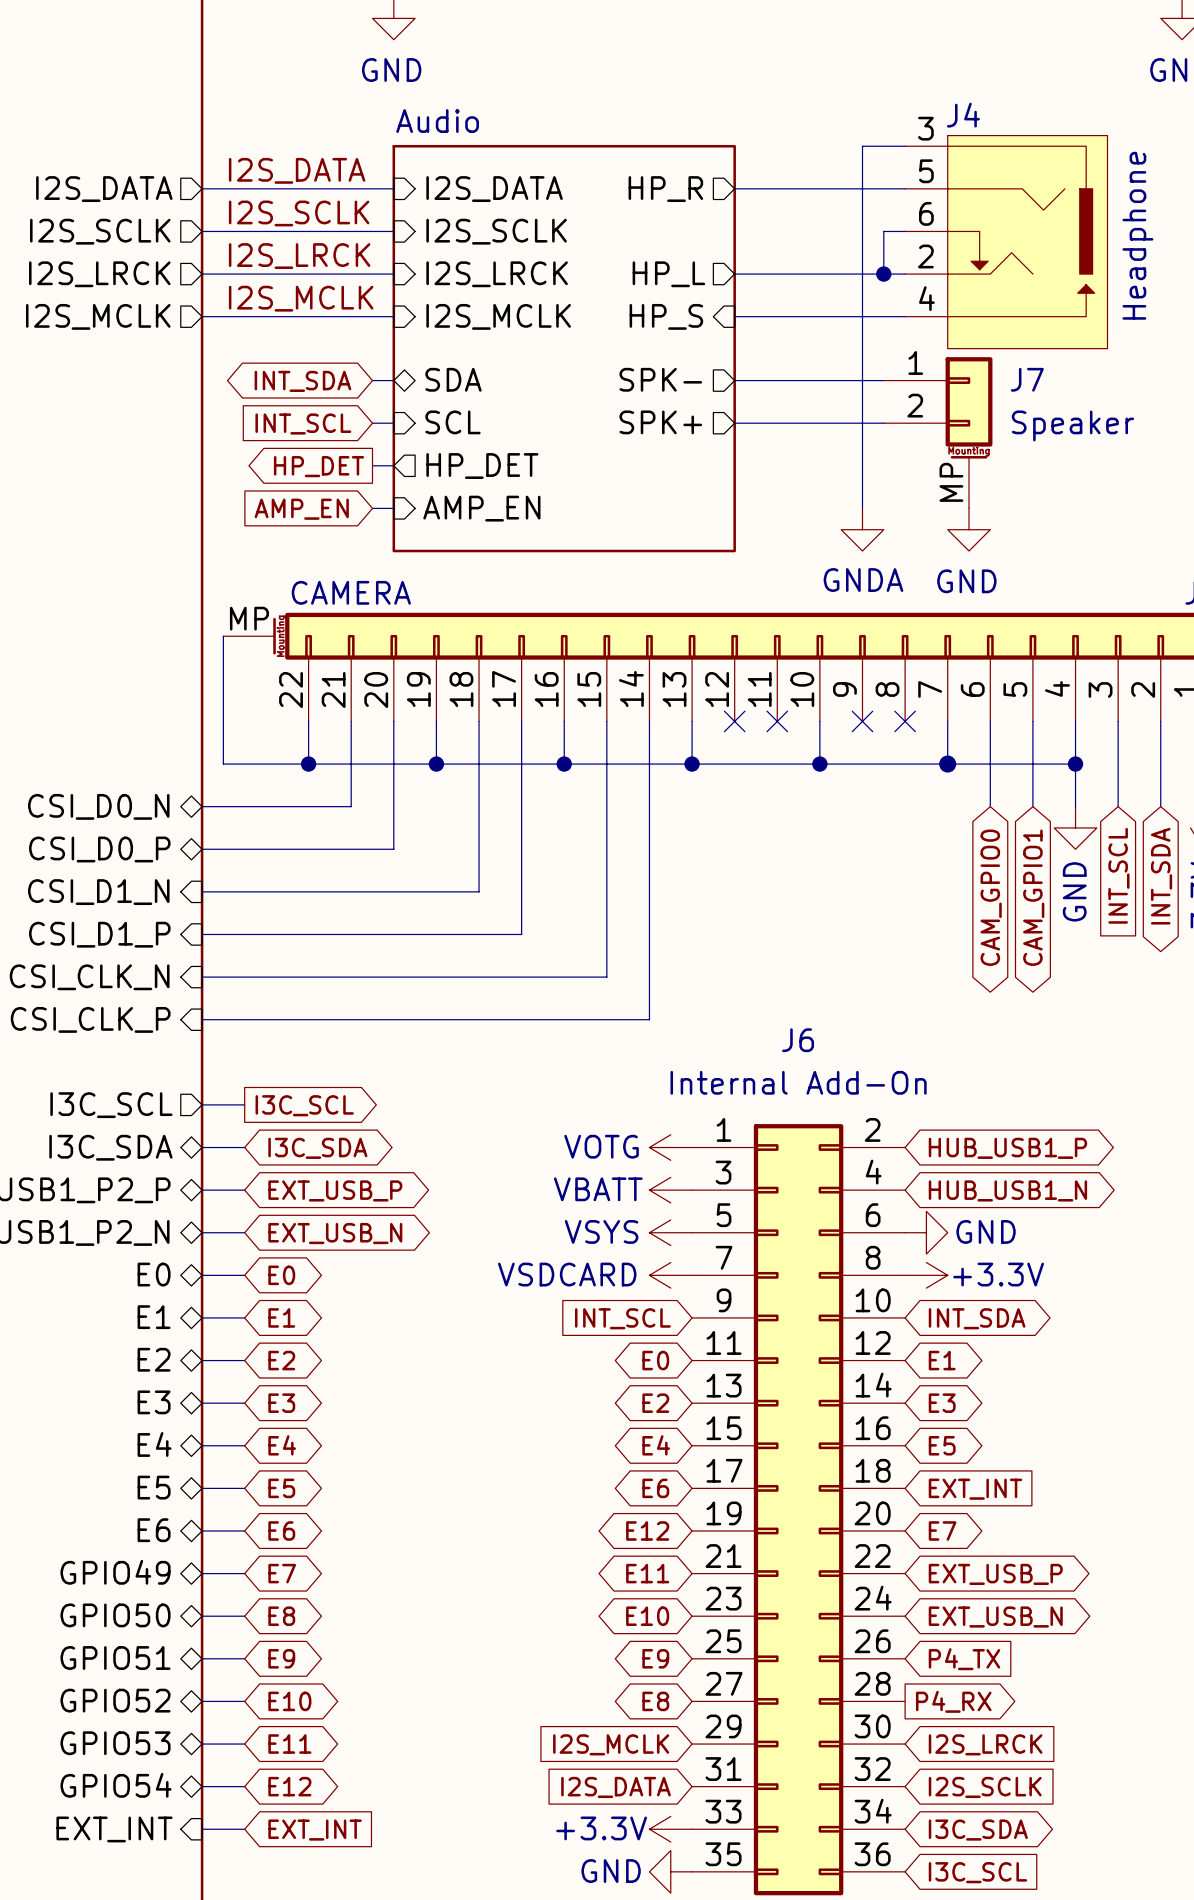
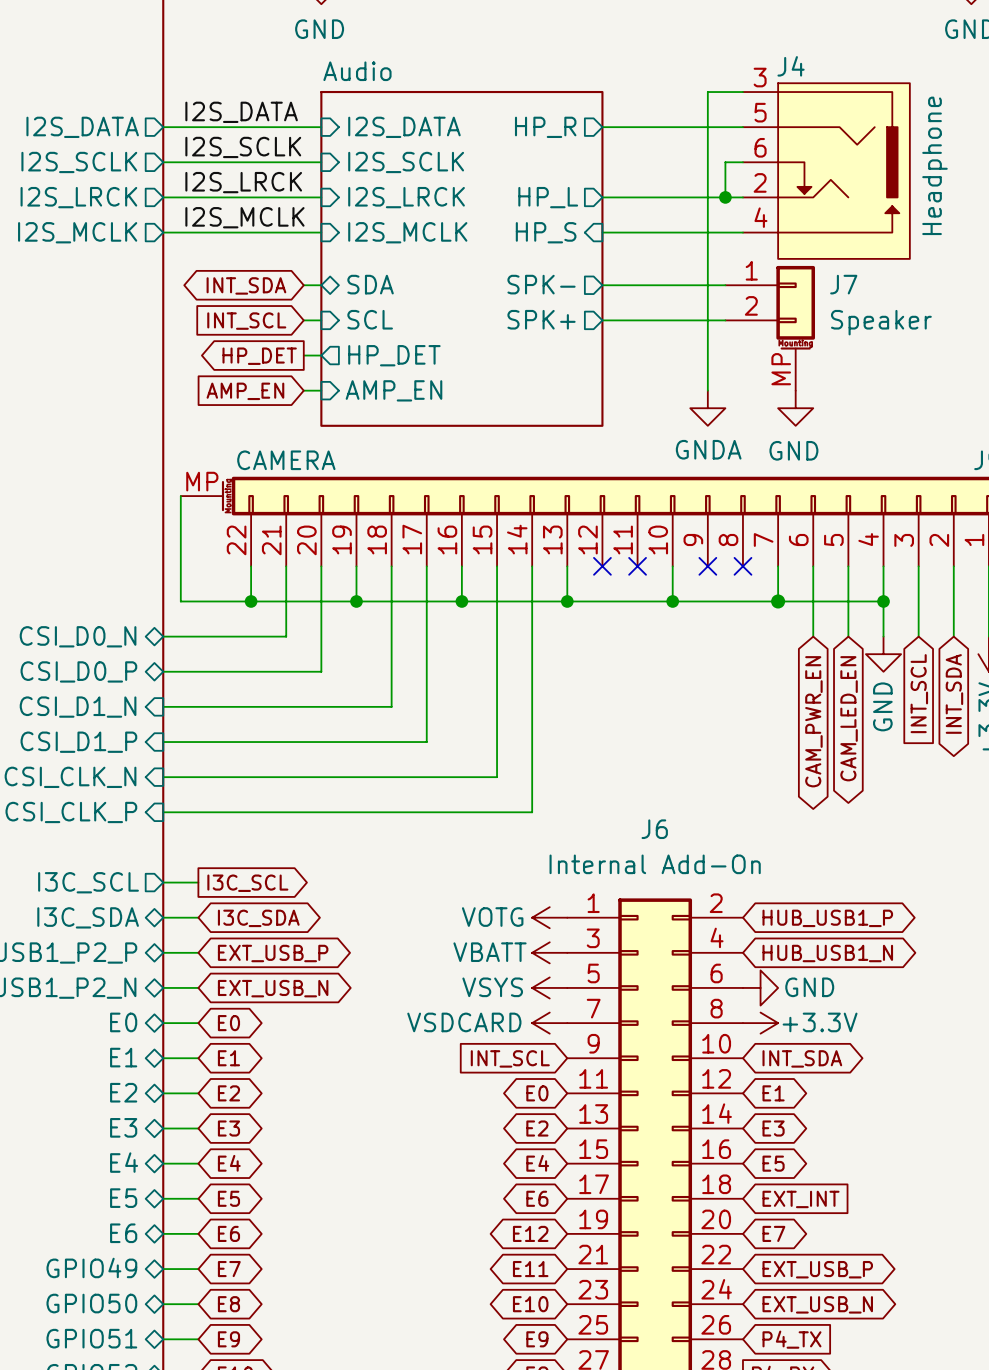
global label: CAM_GPIO0 (991, 897) -> CAM_PWR_EN (813, 721)
global label: CAM_GPIO1 (1033, 897) -> CAM_LED_EN (849, 718)

